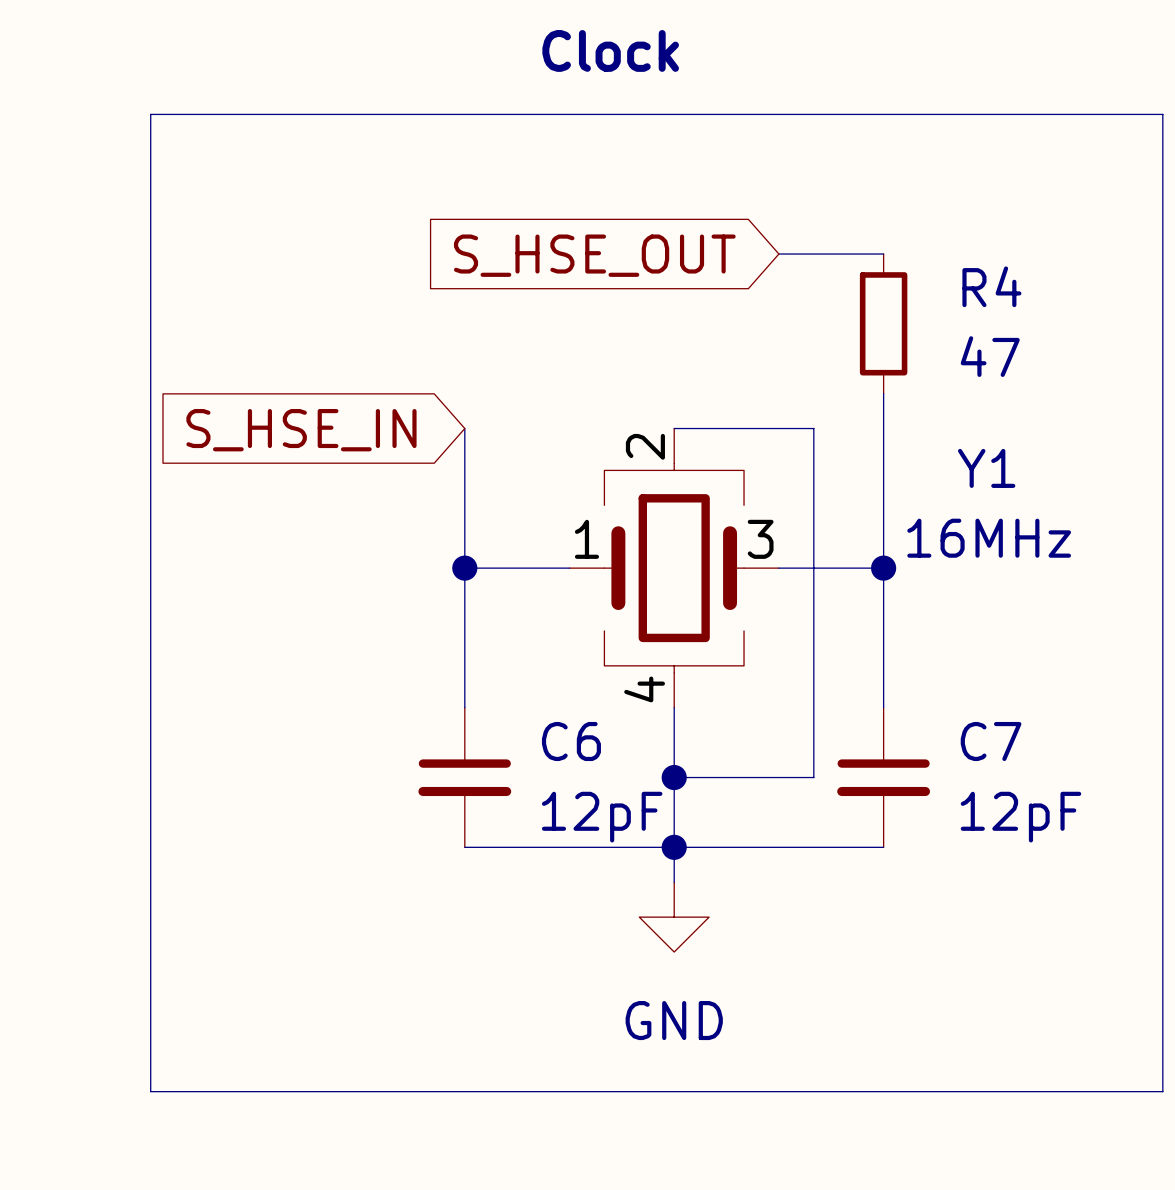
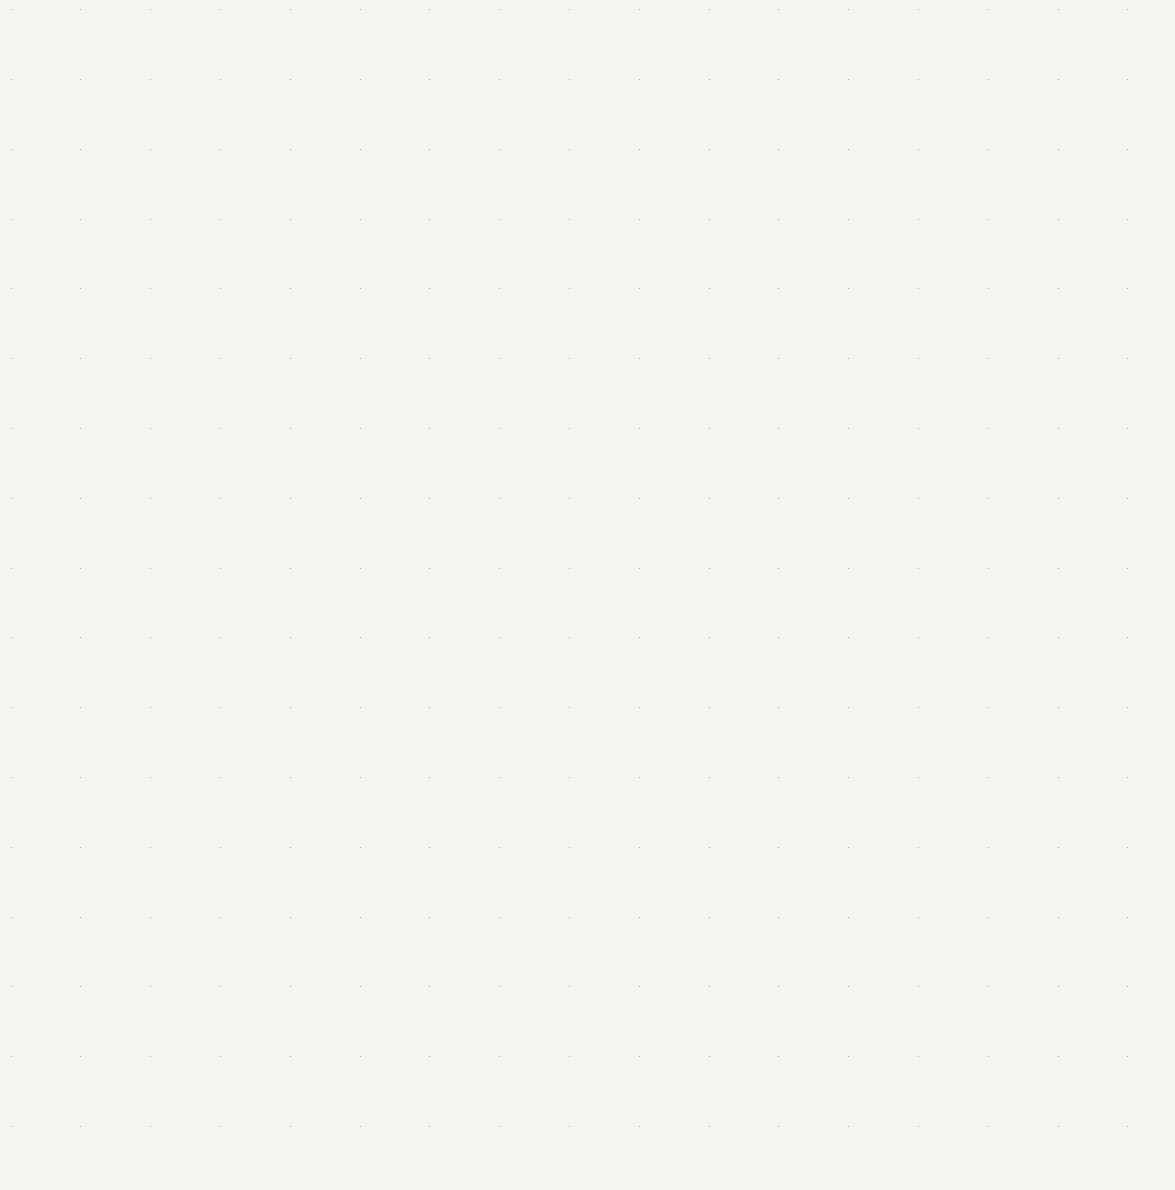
text: Clock (610, 50) -> none
line: (150, 114) (1162, 114) (1162, 1091) (150, 1091) (150, 114) -> none
wire: (778, 254) (883, 254) -> none
global label: S_HSE_OUT (594, 255) -> none
R4: 47 (883, 323) -> none
wire: (883, 393) (883, 707) -> none
wire: (464, 428) (464, 707) -> none
wire: (674, 428) (813, 428) (813, 777) (674, 777) -> none
global label: S_HSE_IN (301, 430) -> none
wire: (464, 568) (569, 568) -> none
junction: (464, 568) -> none
Y1: 16MHz (674, 568) -> none
wire: (778, 568) (883, 568) -> none
junction: (883, 568) -> none
wire: (674, 707) (674, 882) -> none
C6: 12pF (464, 777) -> none
junction: (674, 777) -> none
C7: 12pF (883, 777) -> none
wire: (464, 847) (883, 847) -> none
junction: (674, 847) -> none
power symbol: GND (674, 917) -> none

